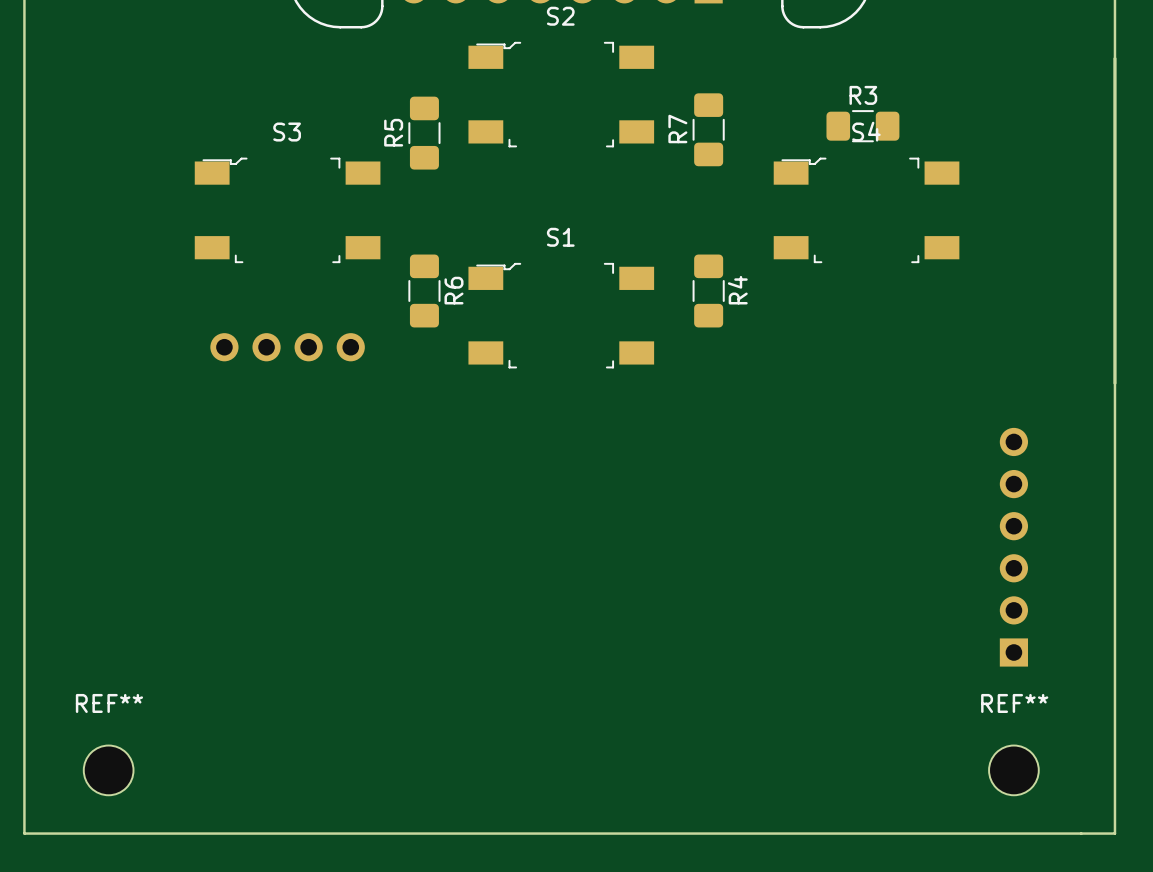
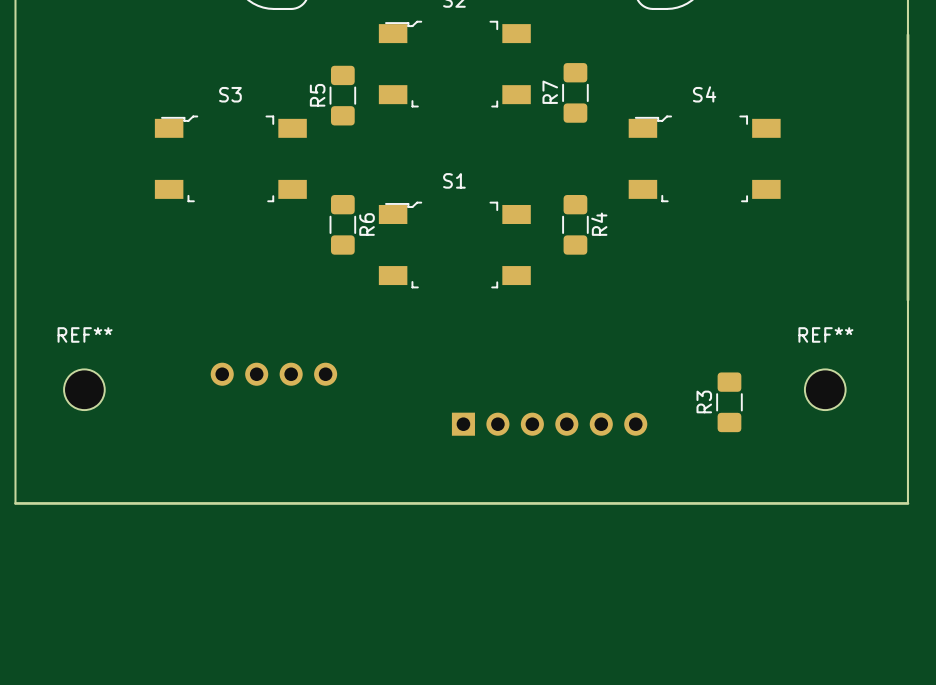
R3 name position: R3 (863, 95) -> R3 (704, 401)
R3 rotation: 0° (862, 126) -> 90° clockwise (729, 402)
R3 position: (862, 126) -> (729, 402)
part position: (287, 347) -> (273, 374)
part rotation: 0° (1013, 547) -> 90° clockwise (549, 424)
part position: (1013, 547) -> (549, 424)
board edge: (24, 631) (24, 833) (1114, 833) (1114, 631) -> (15, 503) (907, 503)
REF** position: (108, 770) -> (84, 389)
REF** position: (1013, 770) -> (825, 389)

